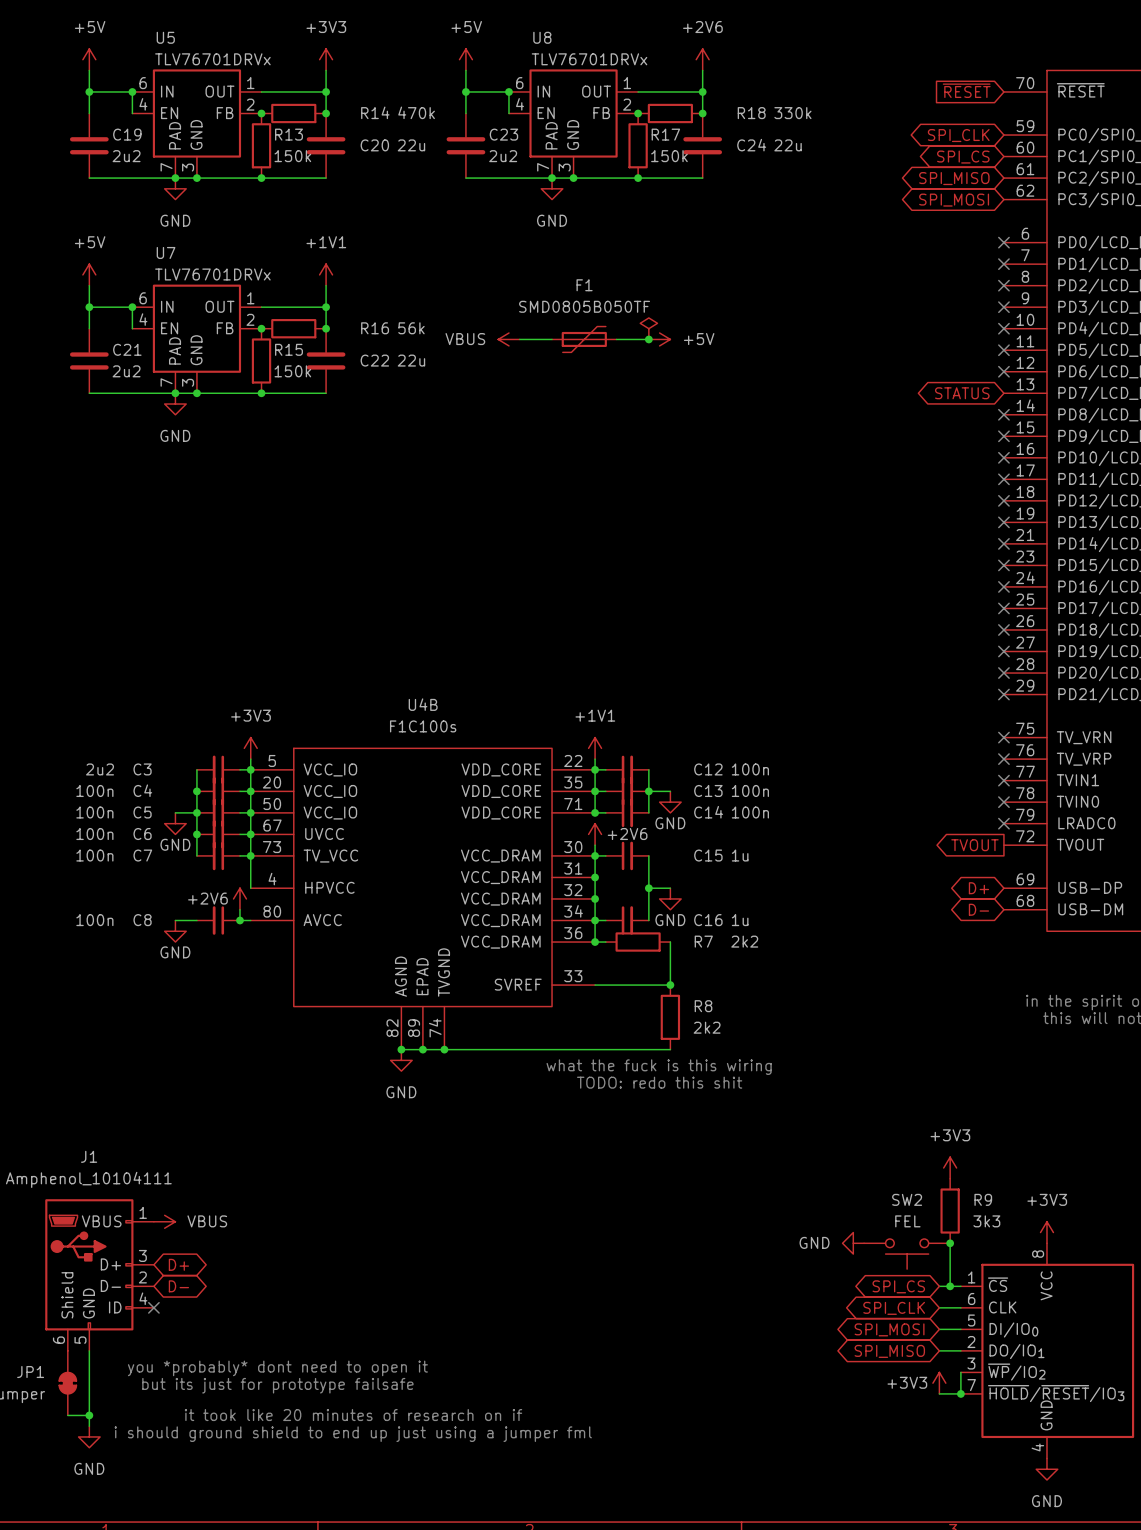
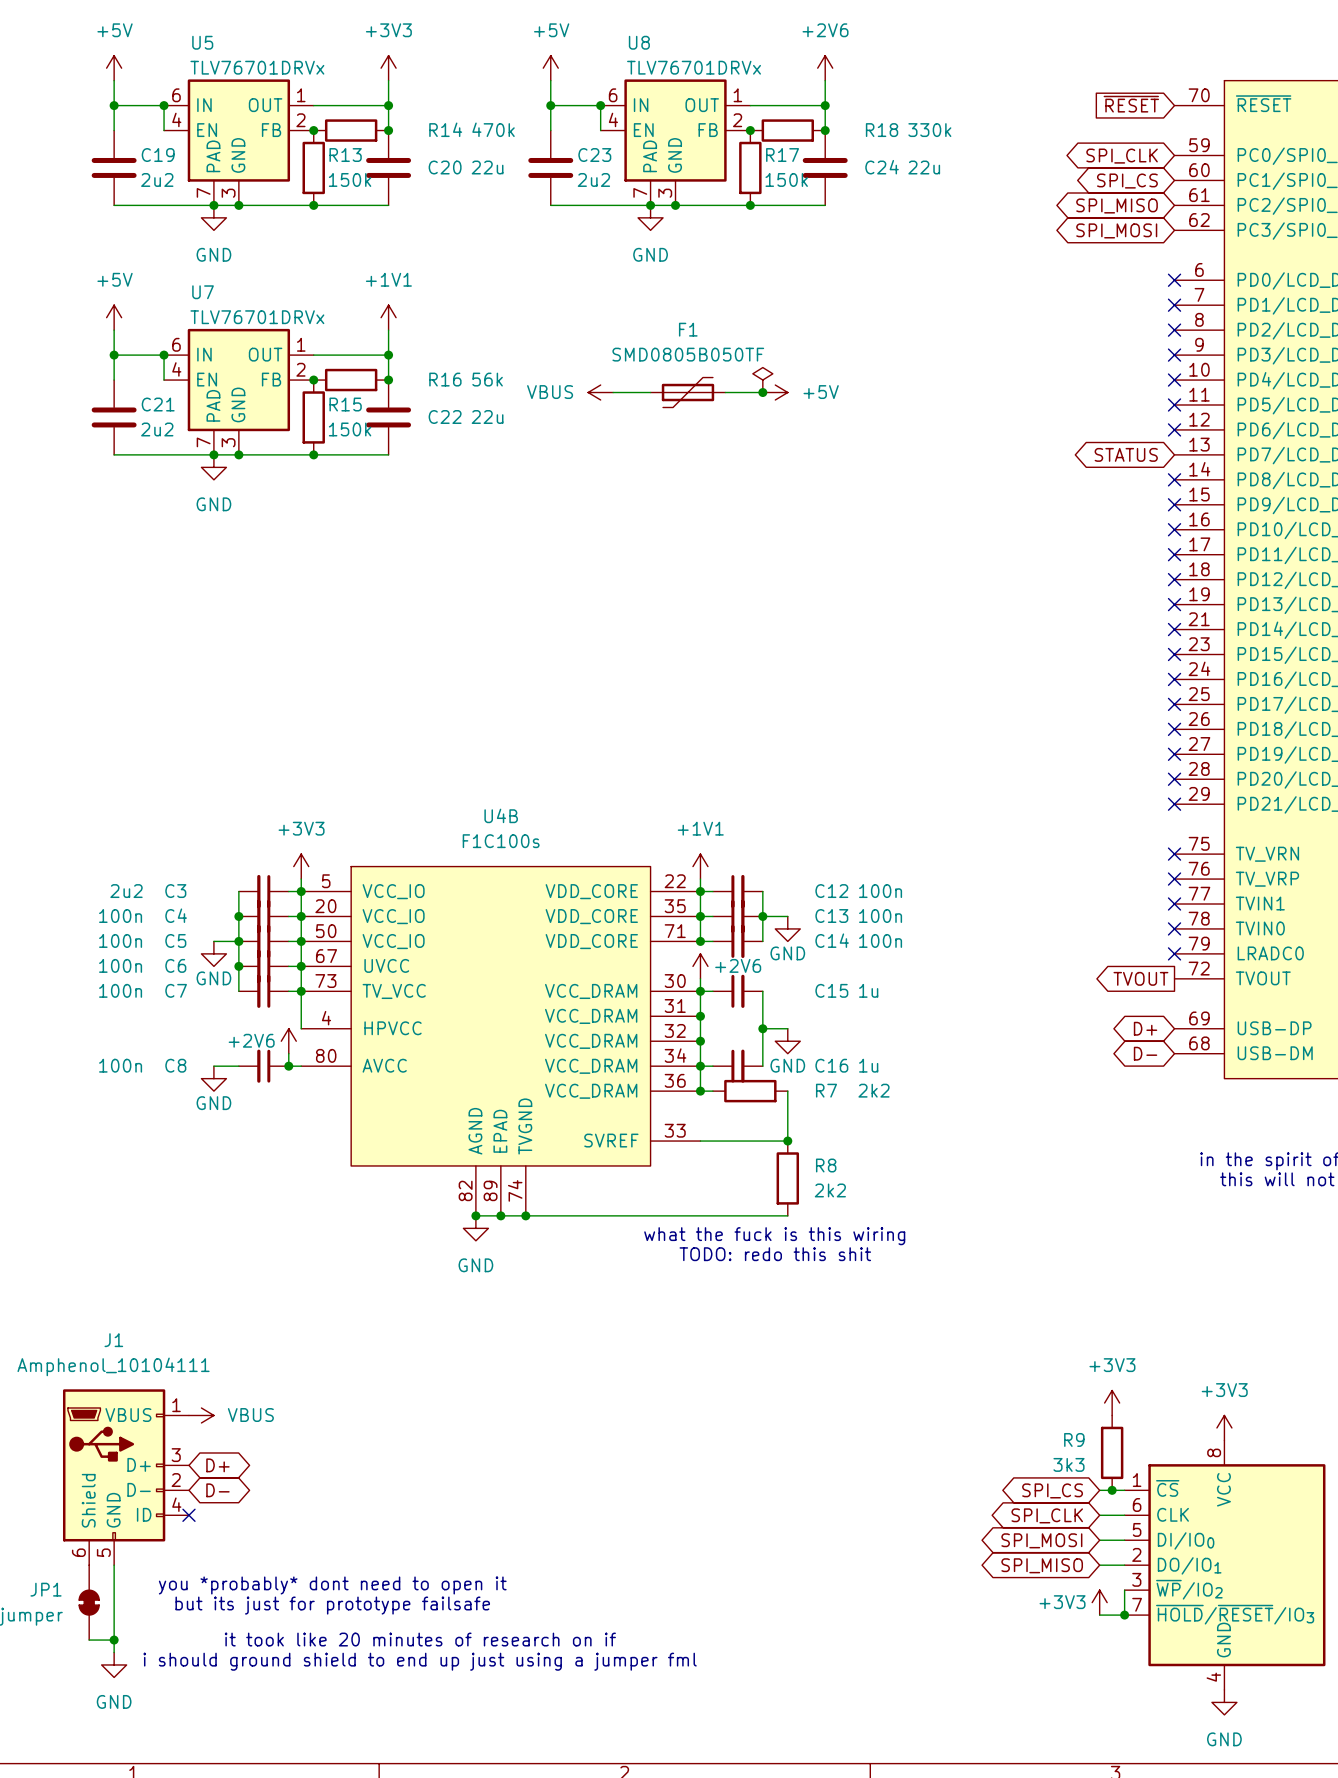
power symbol position: +3V3 (950, 1167) -> +3V3 (1112, 1403)
R9 name position: R9 (983, 1199) -> R9 (1074, 1439)
R9 position: (950, 1211) -> (1112, 1452)
R9 value position: 3k3 (986, 1221) -> 3k3 (1068, 1464)
power symbol: GND (853, 1243) -> none
wire: (950, 1243) (950, 1286) -> none
junction: (950, 1243) -> none
SW2: FEL (907, 1254) -> none

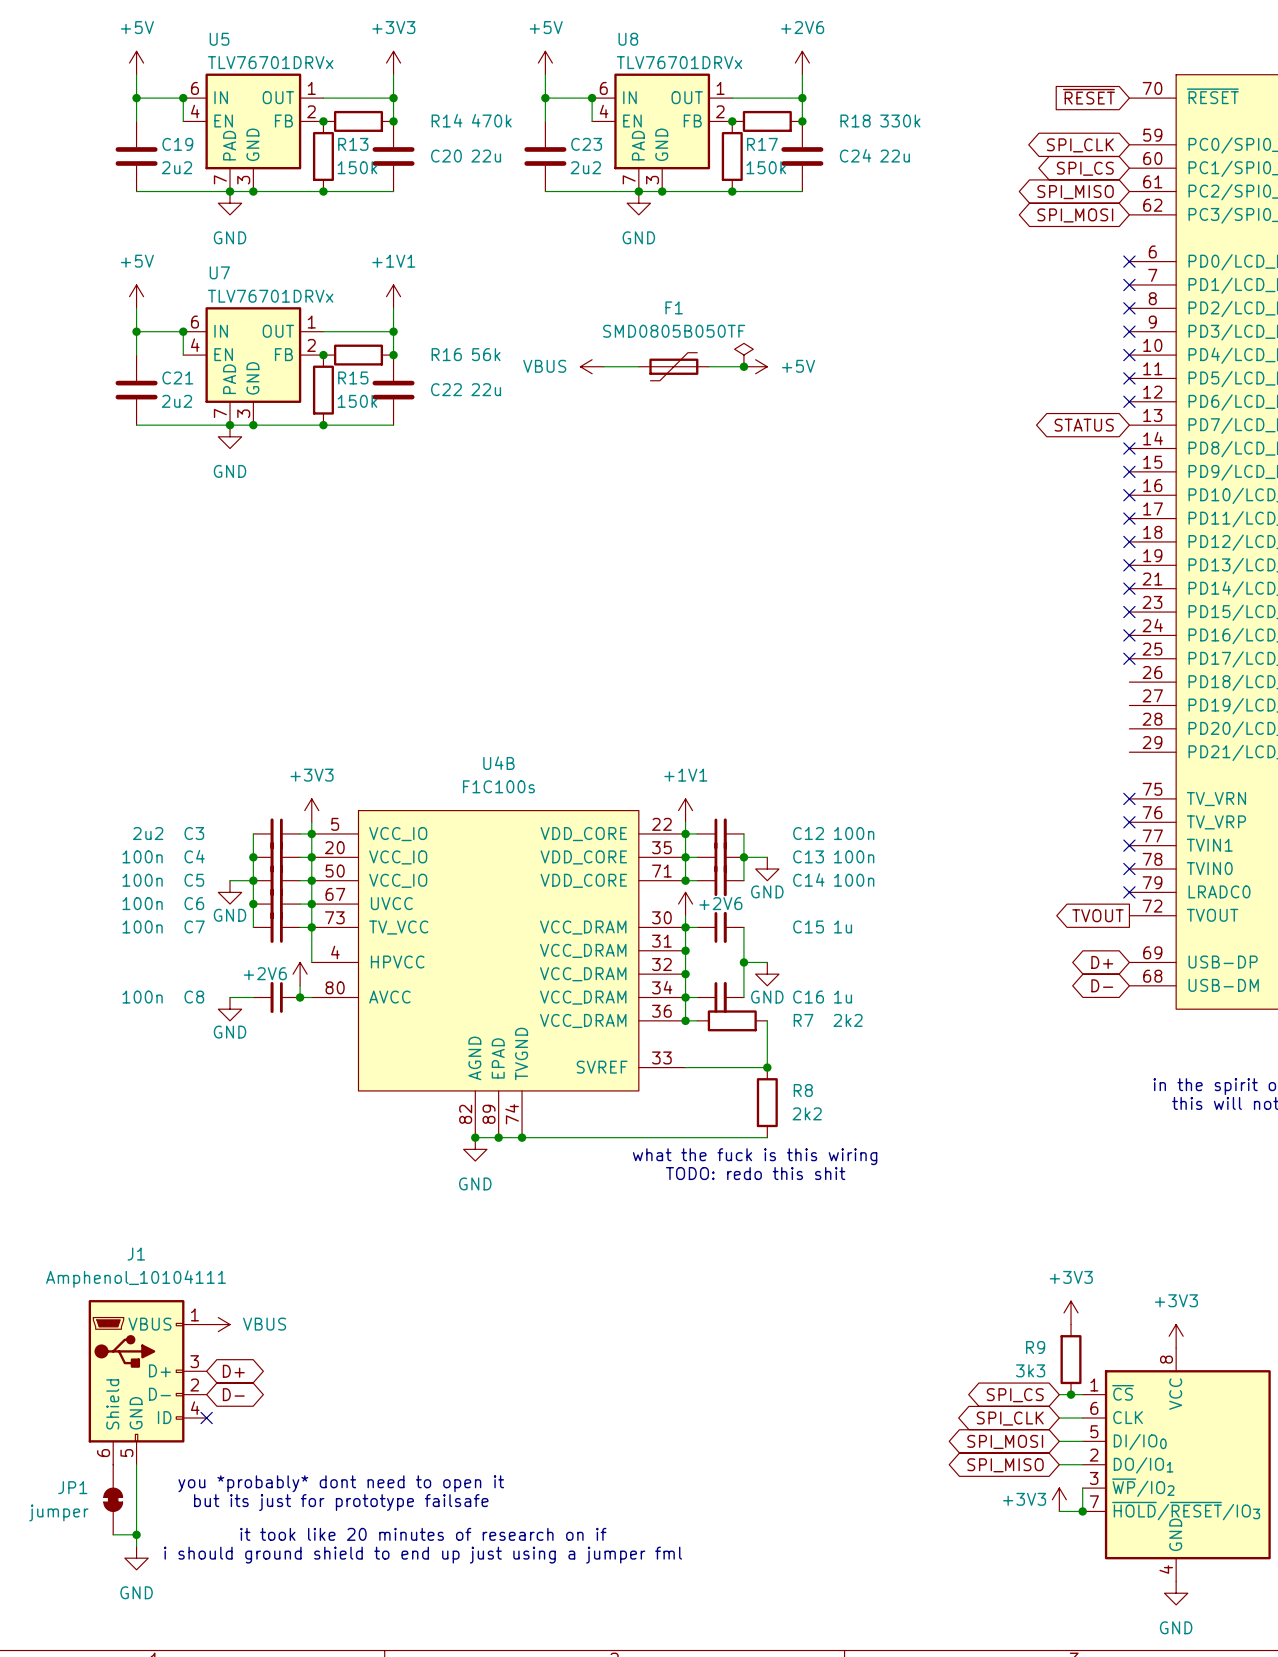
no-connect mark: (1174, 729) -> none
no-connect mark: (1174, 754) -> none
no-connect mark: (1174, 779) -> none
no-connect mark: (1174, 804) -> none

